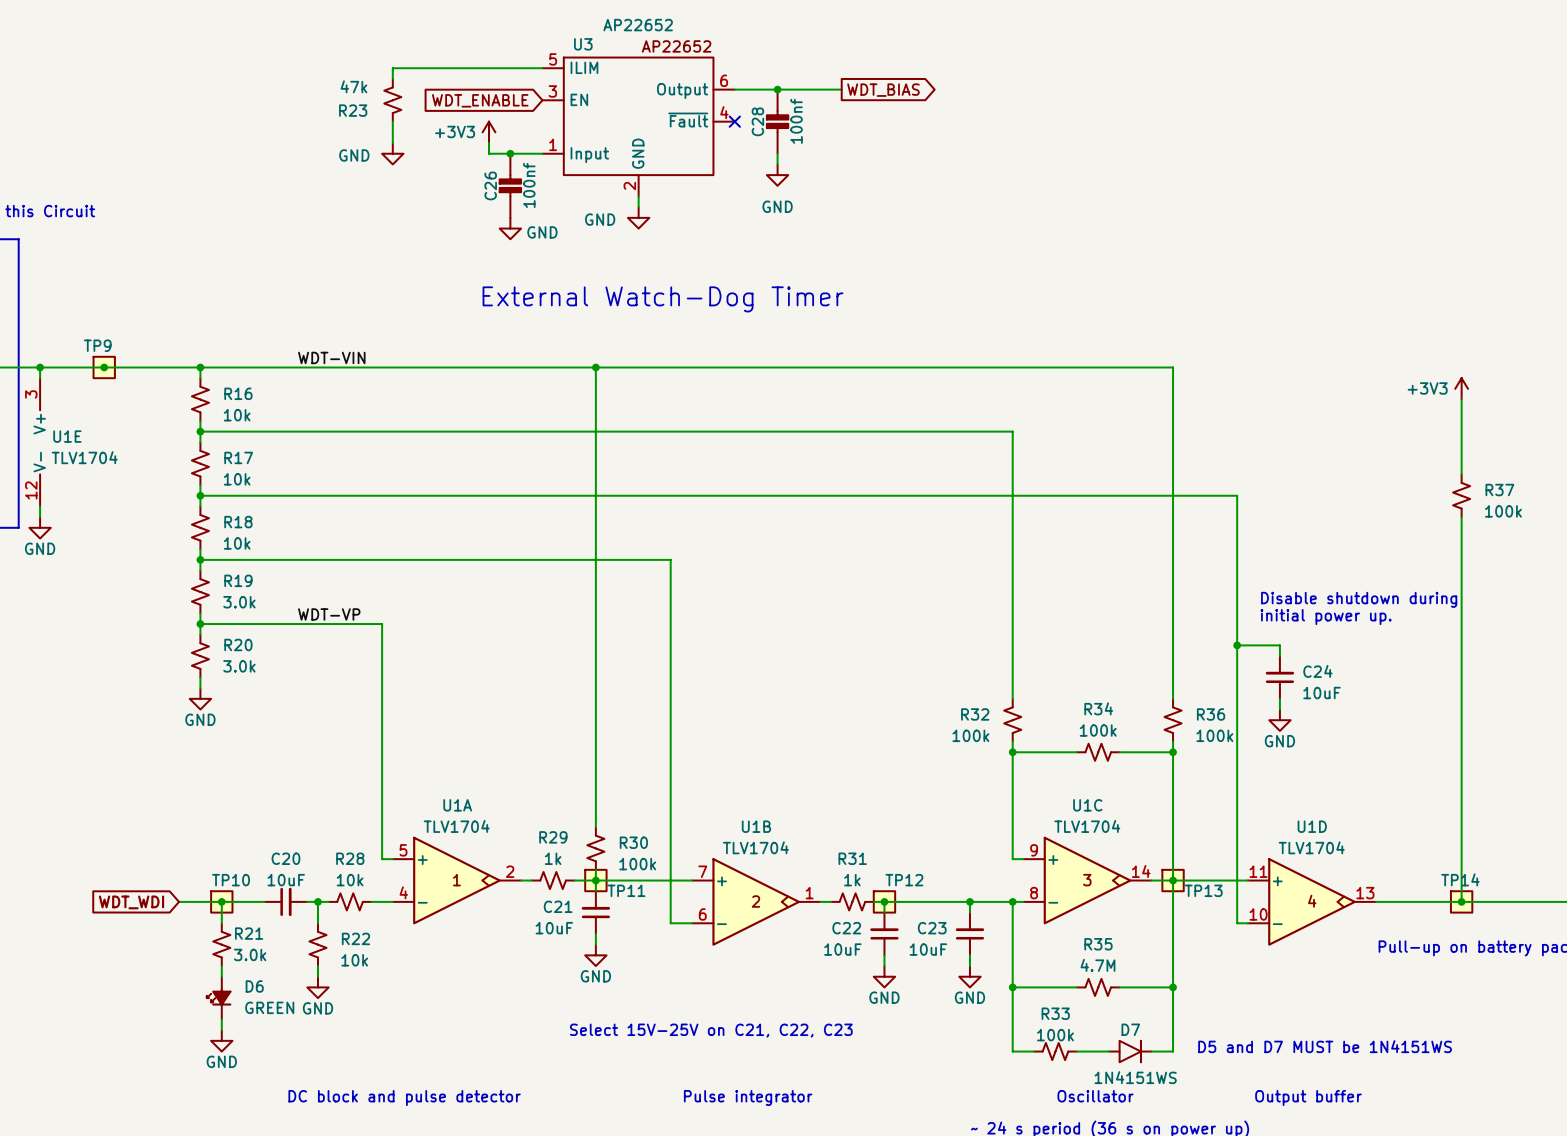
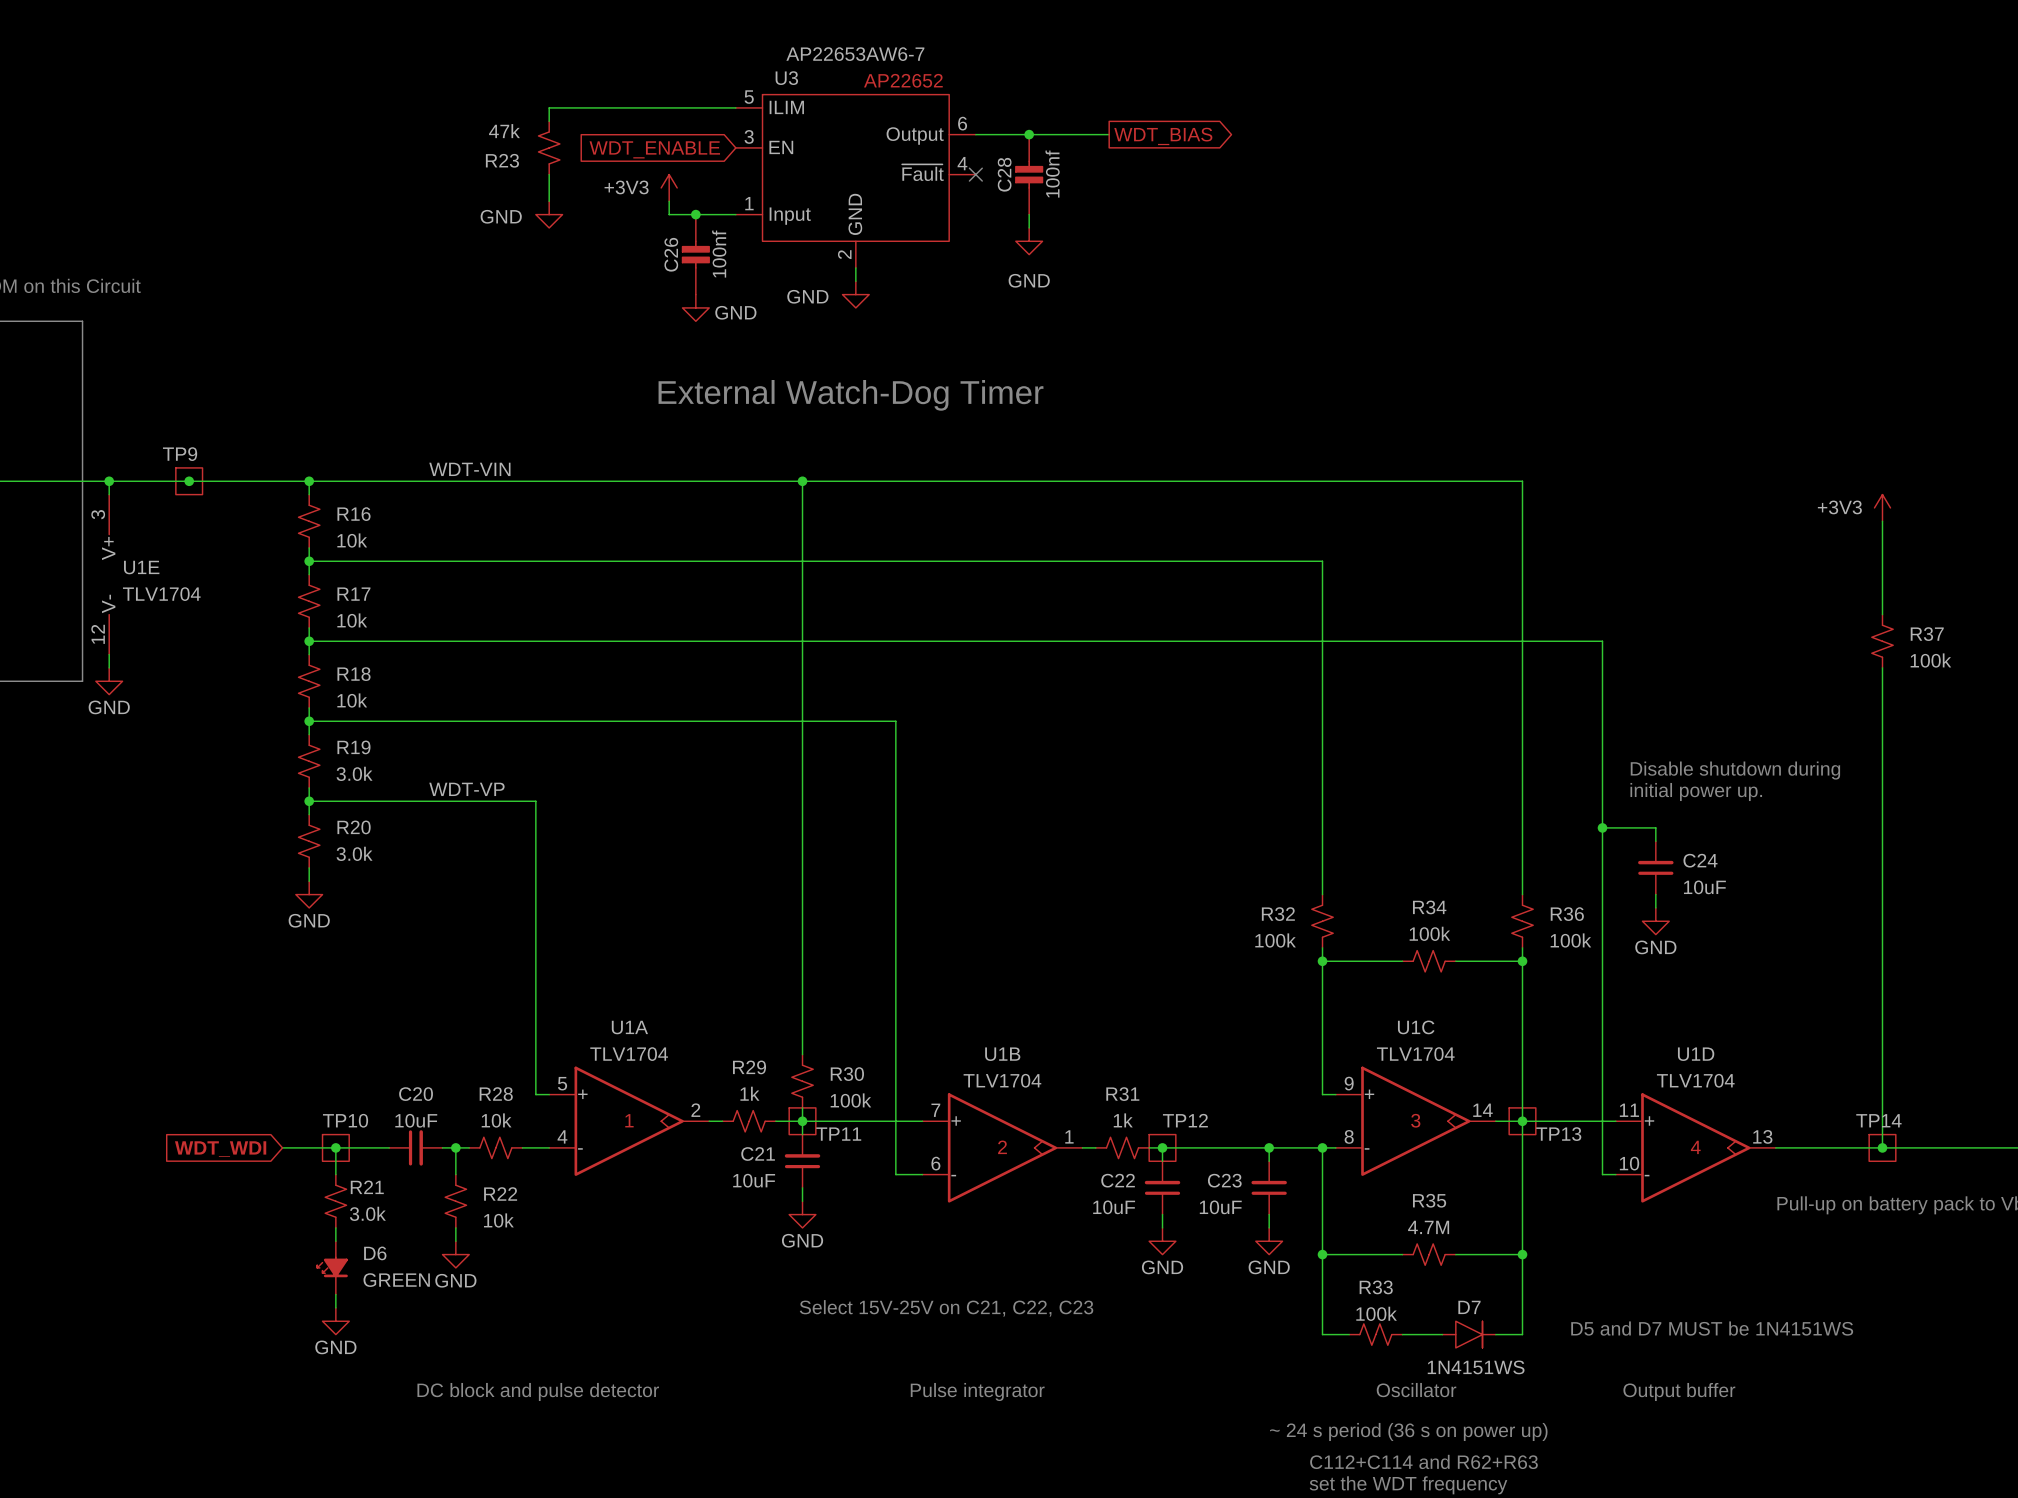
U3 value: AP22652 (638, 25) -> AP22653AW6-7 (855, 54)

